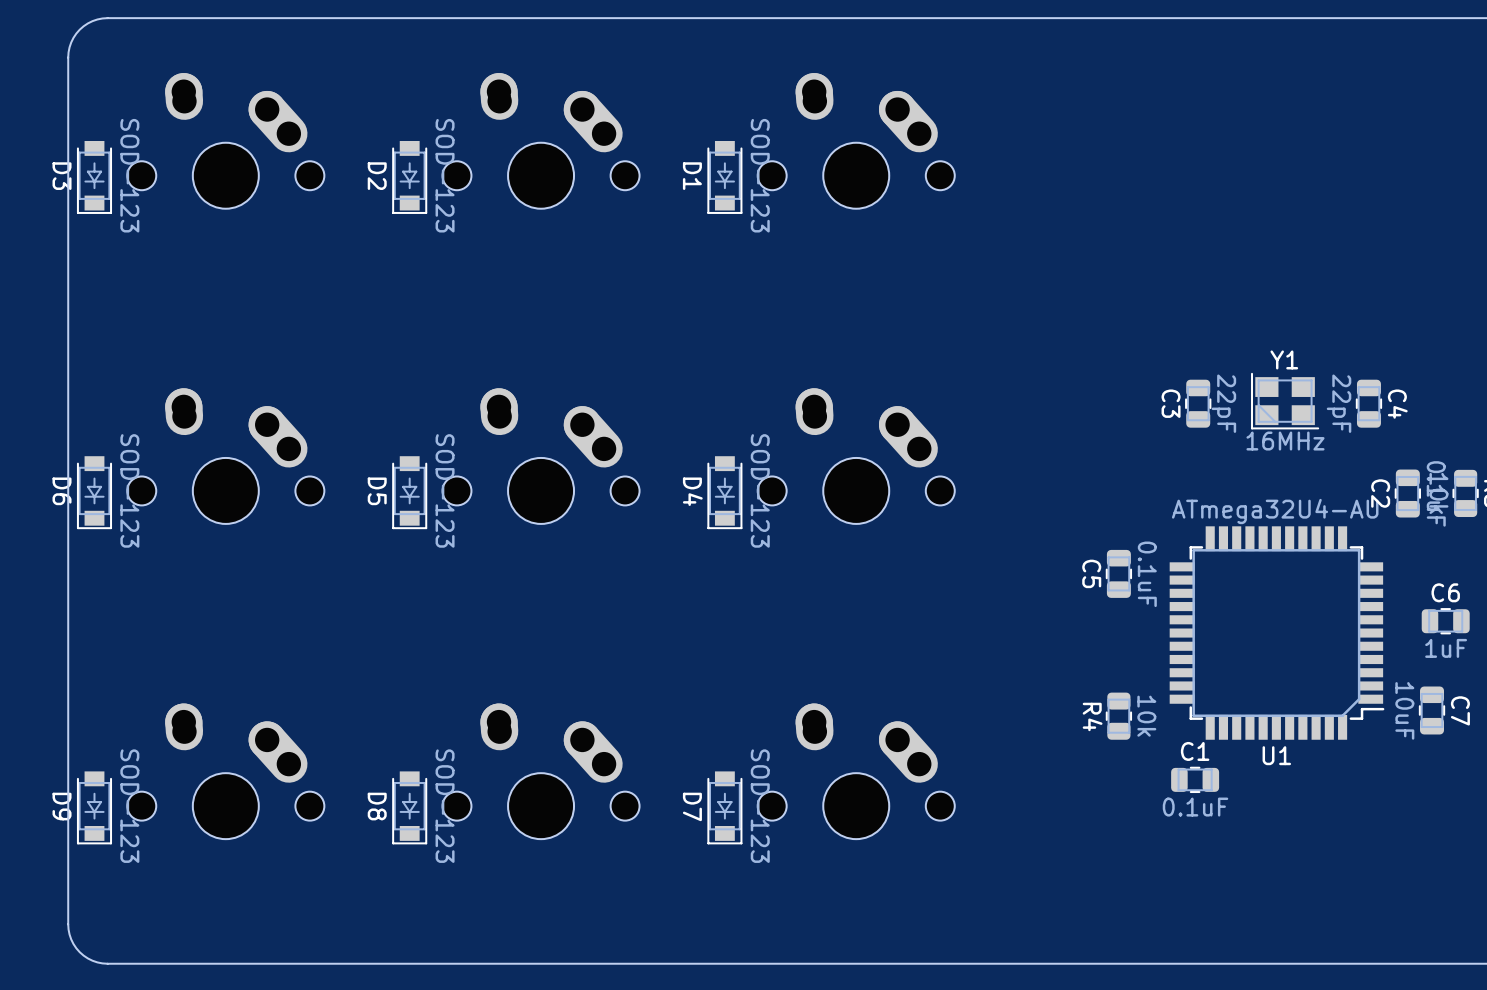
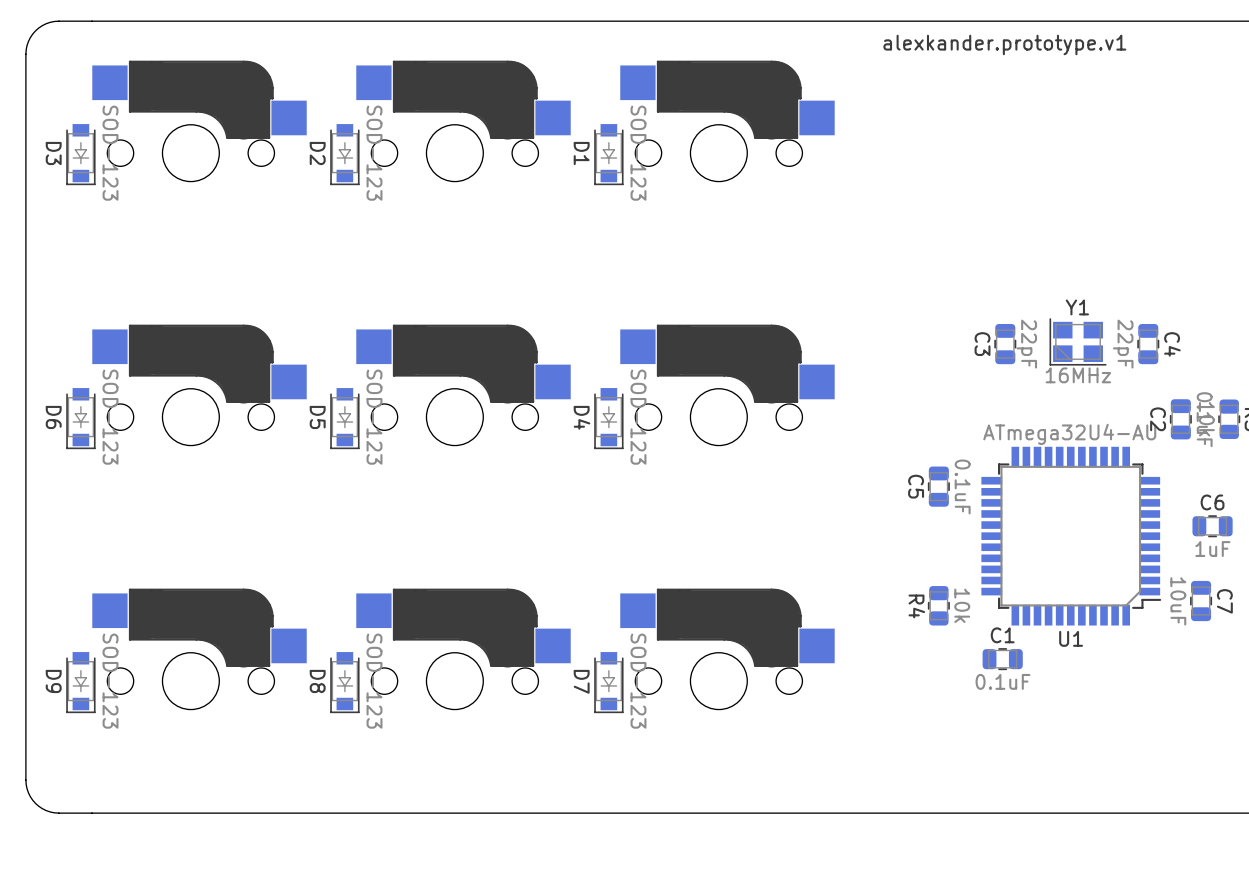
board edge: (107, 18) (92, 21) (79, 29) (71, 42) (68, 57) (68, 924) (71, 939) (79, 952) (92, 960) (107, 963) -> (91, 21) (54, 21) (42, 25) (30, 37) (25, 54) (26, 784) (32, 800) (46, 810) (58, 813) (91, 813)
text: none -> alexkander.prototype.v1 (1004, 44)
part footprint: [127, 73, 325, 209] -> [92, 60, 307, 182]
part footprint: [442, 73, 640, 209] -> [356, 60, 571, 182]
part footprint: [757, 73, 955, 209] -> [620, 60, 835, 182]
part footprint: [127, 388, 325, 524] -> [92, 324, 307, 446]
part footprint: [442, 388, 640, 524] -> [356, 324, 571, 446]
part footprint: [757, 388, 955, 524] -> [620, 324, 835, 446]
part footprint: [127, 703, 325, 840] -> [92, 588, 307, 710]
part footprint: [442, 703, 640, 840] -> [356, 588, 571, 710]
part footprint: [757, 703, 955, 840] -> [620, 588, 835, 710]

